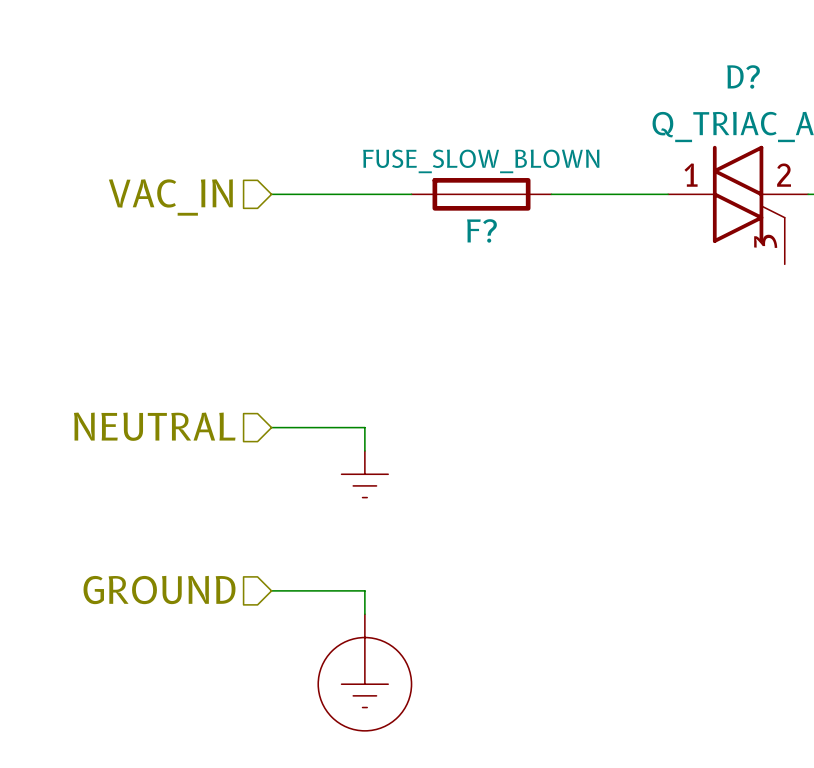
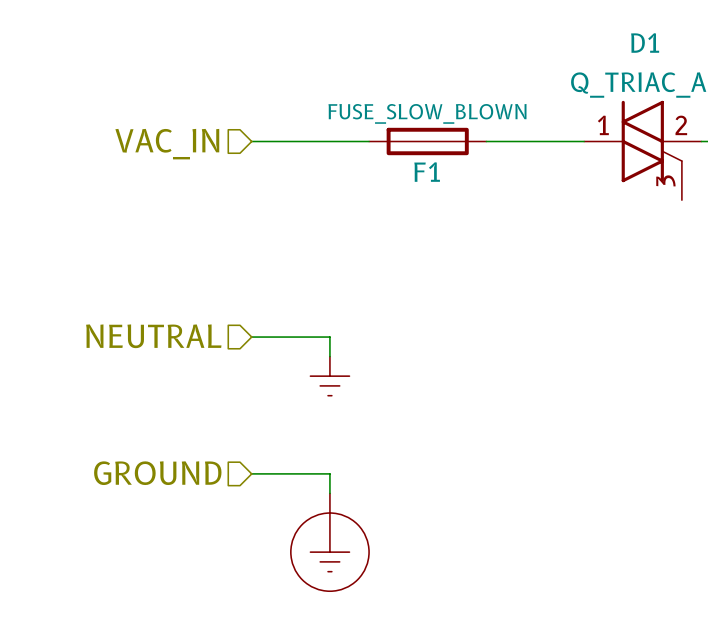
D? name: D? (743, 76) -> D1 (645, 43)
F? name: F? (481, 230) -> F1 (427, 172)

